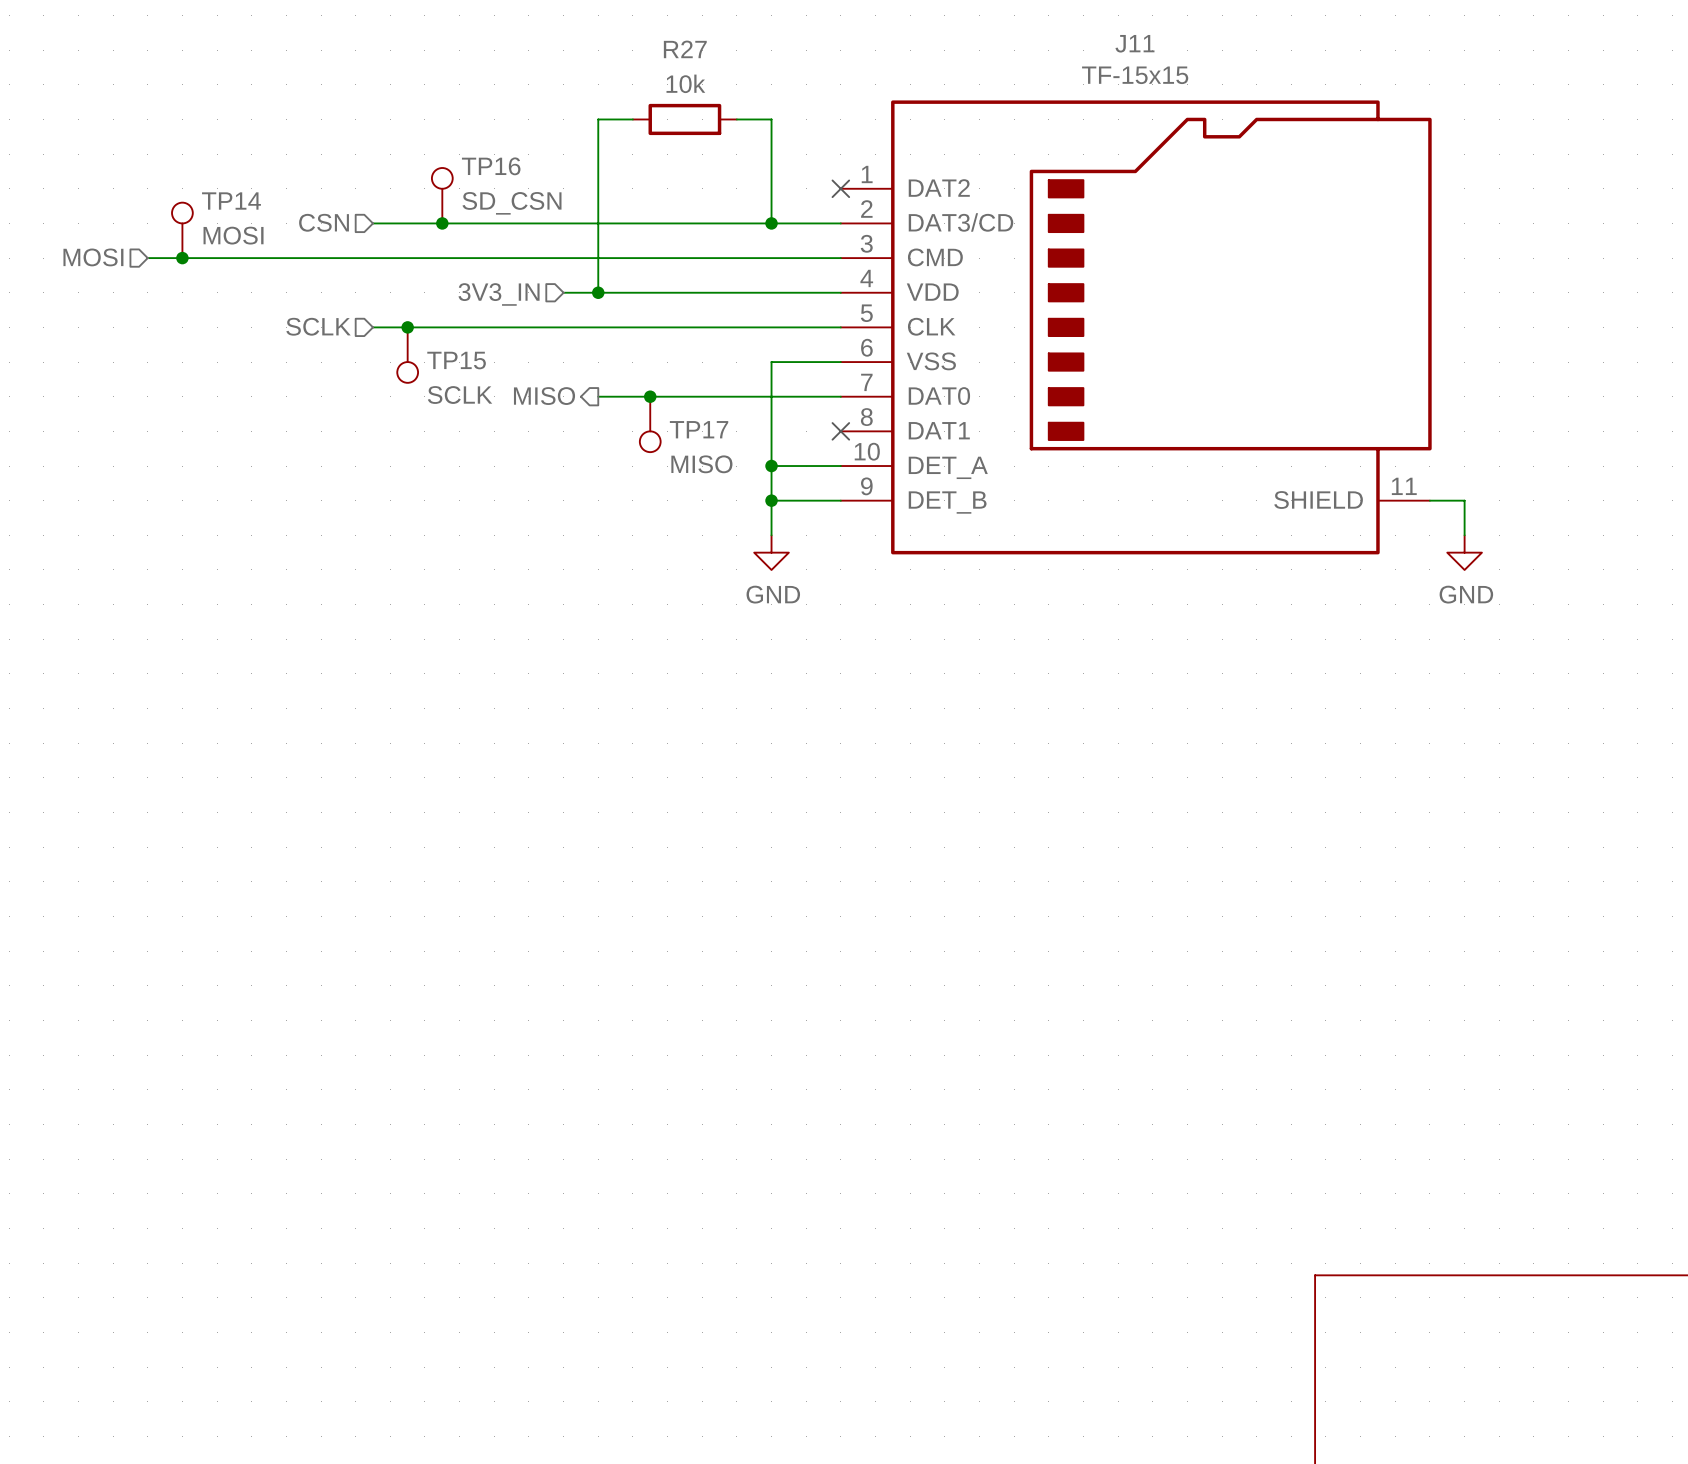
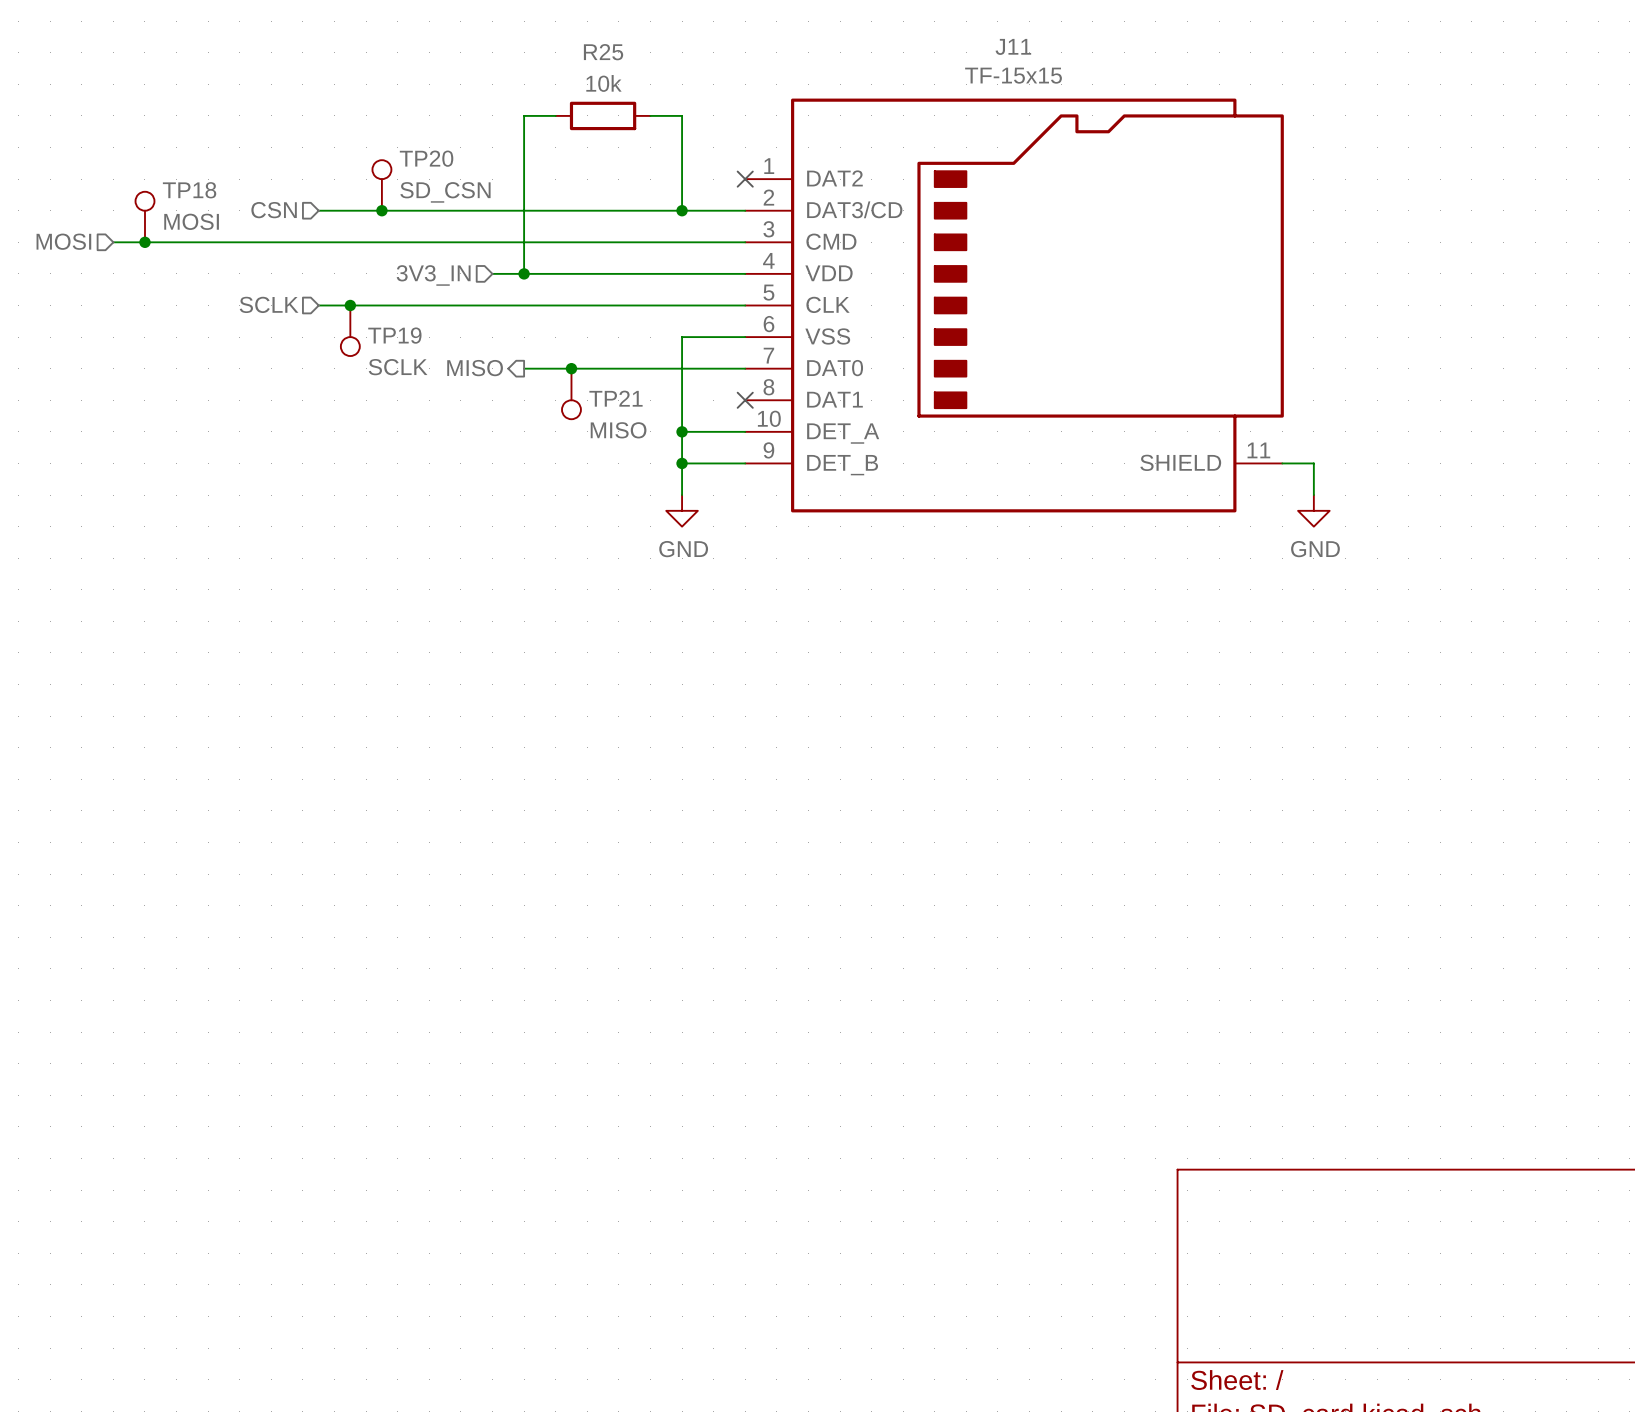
R27 name: R27 (685, 49) -> R25 (603, 52)
TP16 name: TP16 (491, 166) -> TP20 (426, 158)
TP14 name: TP14 (231, 201) -> TP18 (189, 190)
TP15 name: TP15 (456, 360) -> TP19 (394, 335)
TP17 name: TP17 (699, 429) -> TP21 (615, 398)

